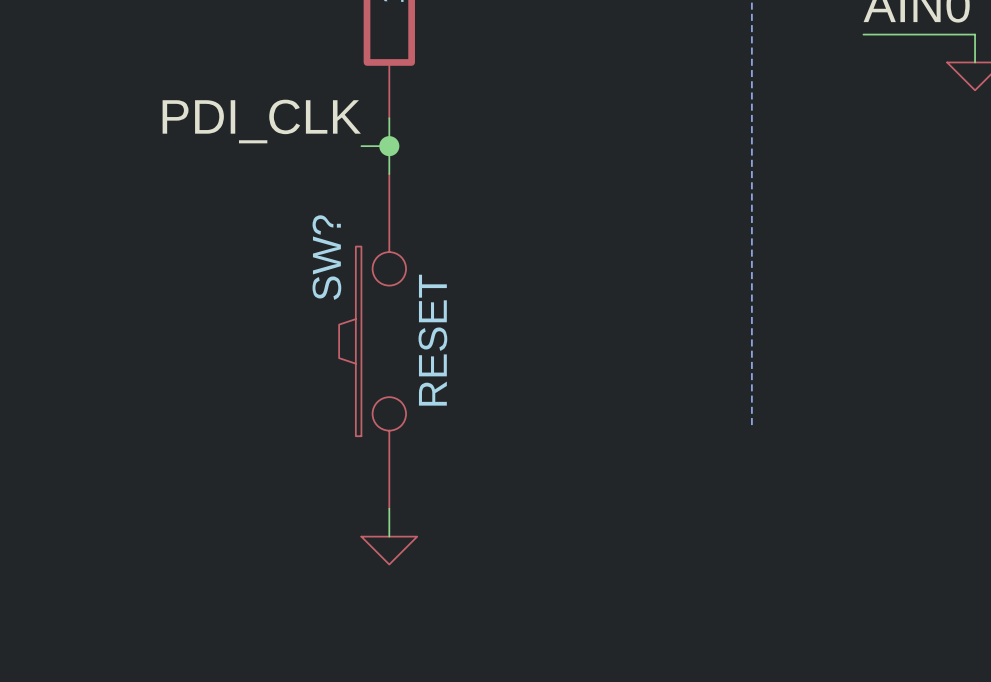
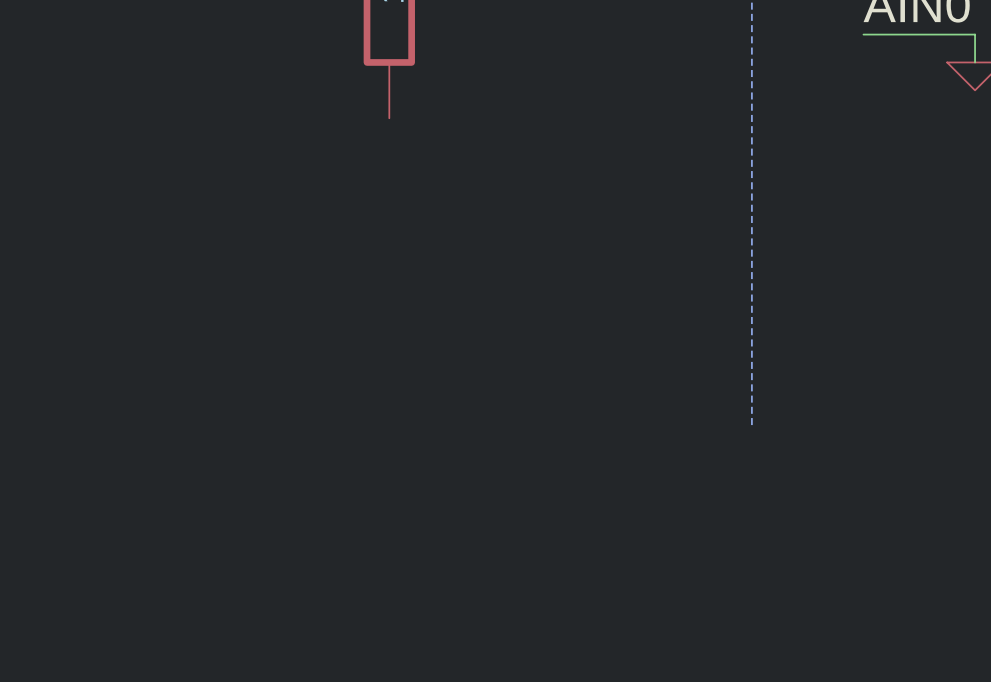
wire: (389, 118) (389, 174) -> none
label: PDI_CLK (261, 121) -> none
wire: (361, 146) (389, 146) -> none
junction: (389, 146) -> none
SW?: RESET (372, 341) -> none
wire: (389, 508) (389, 536) -> none
power symbol: (389, 550) -> none

